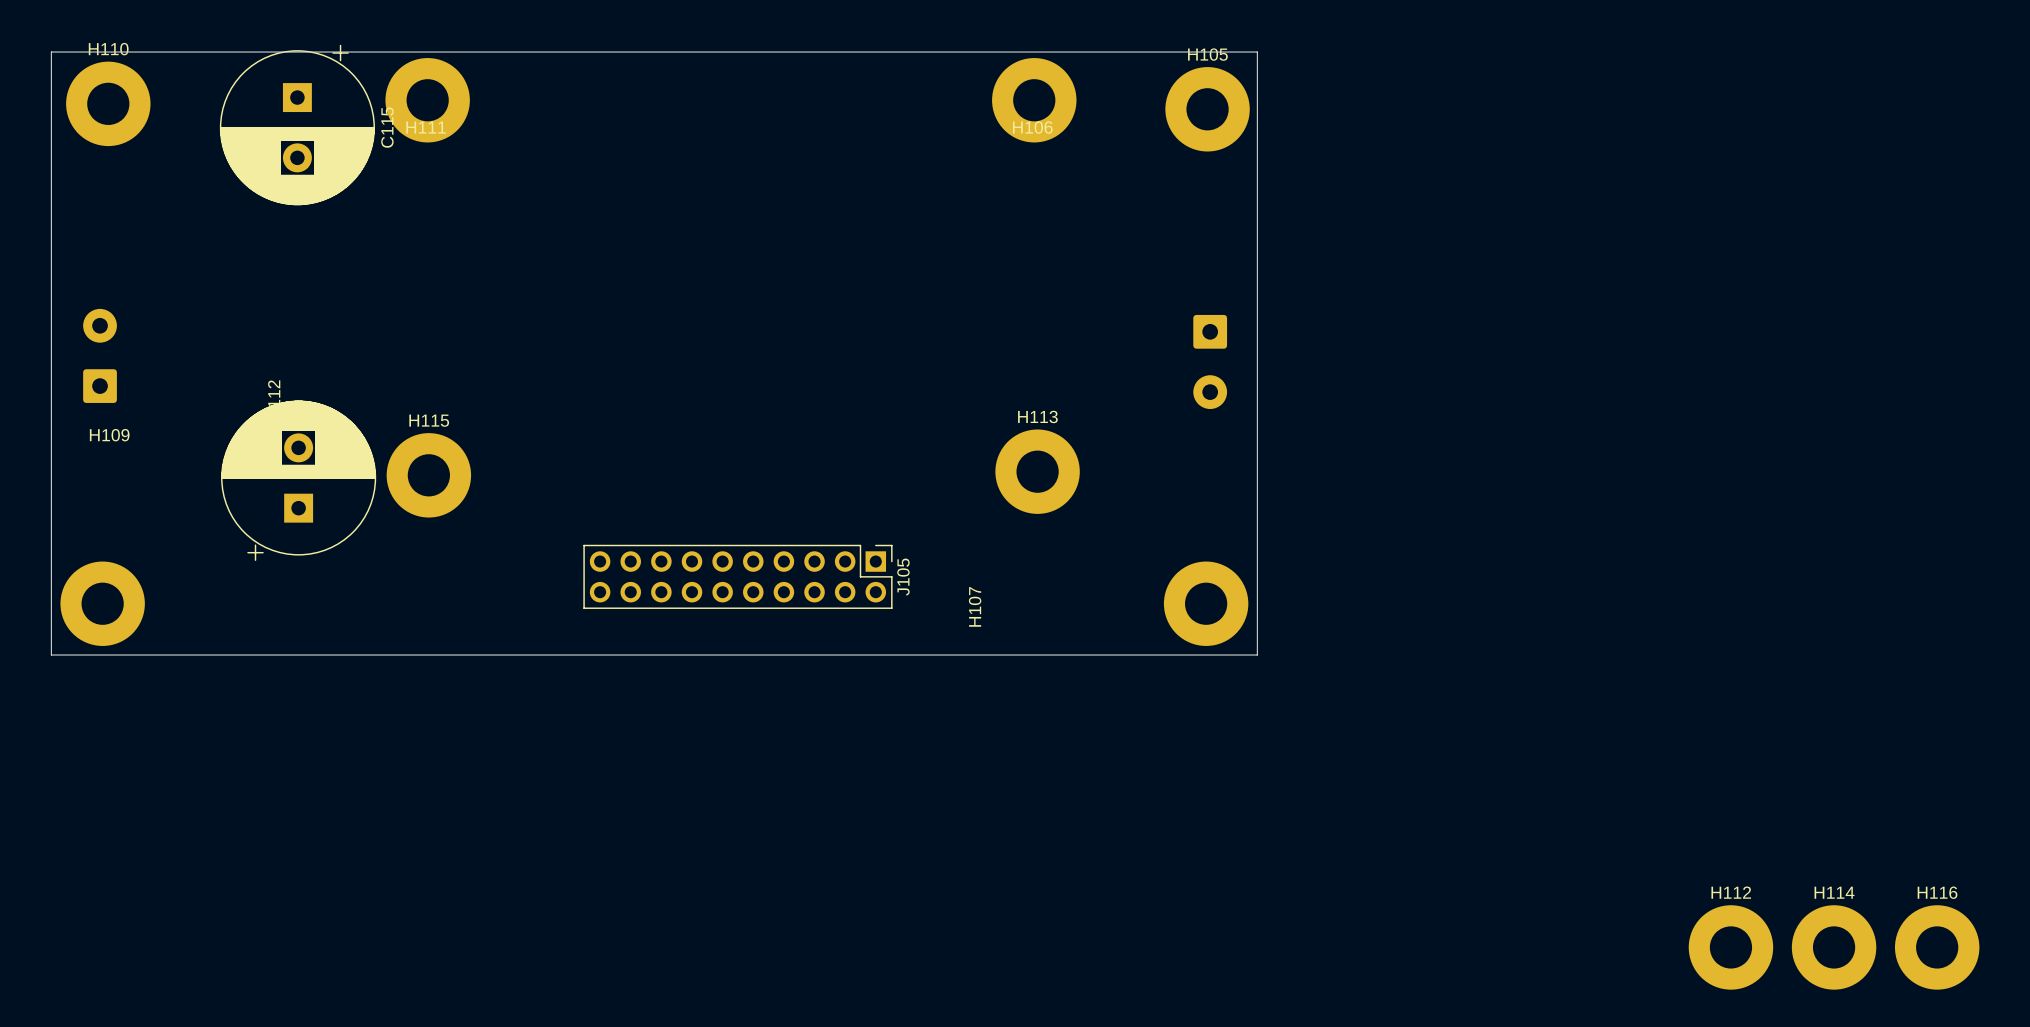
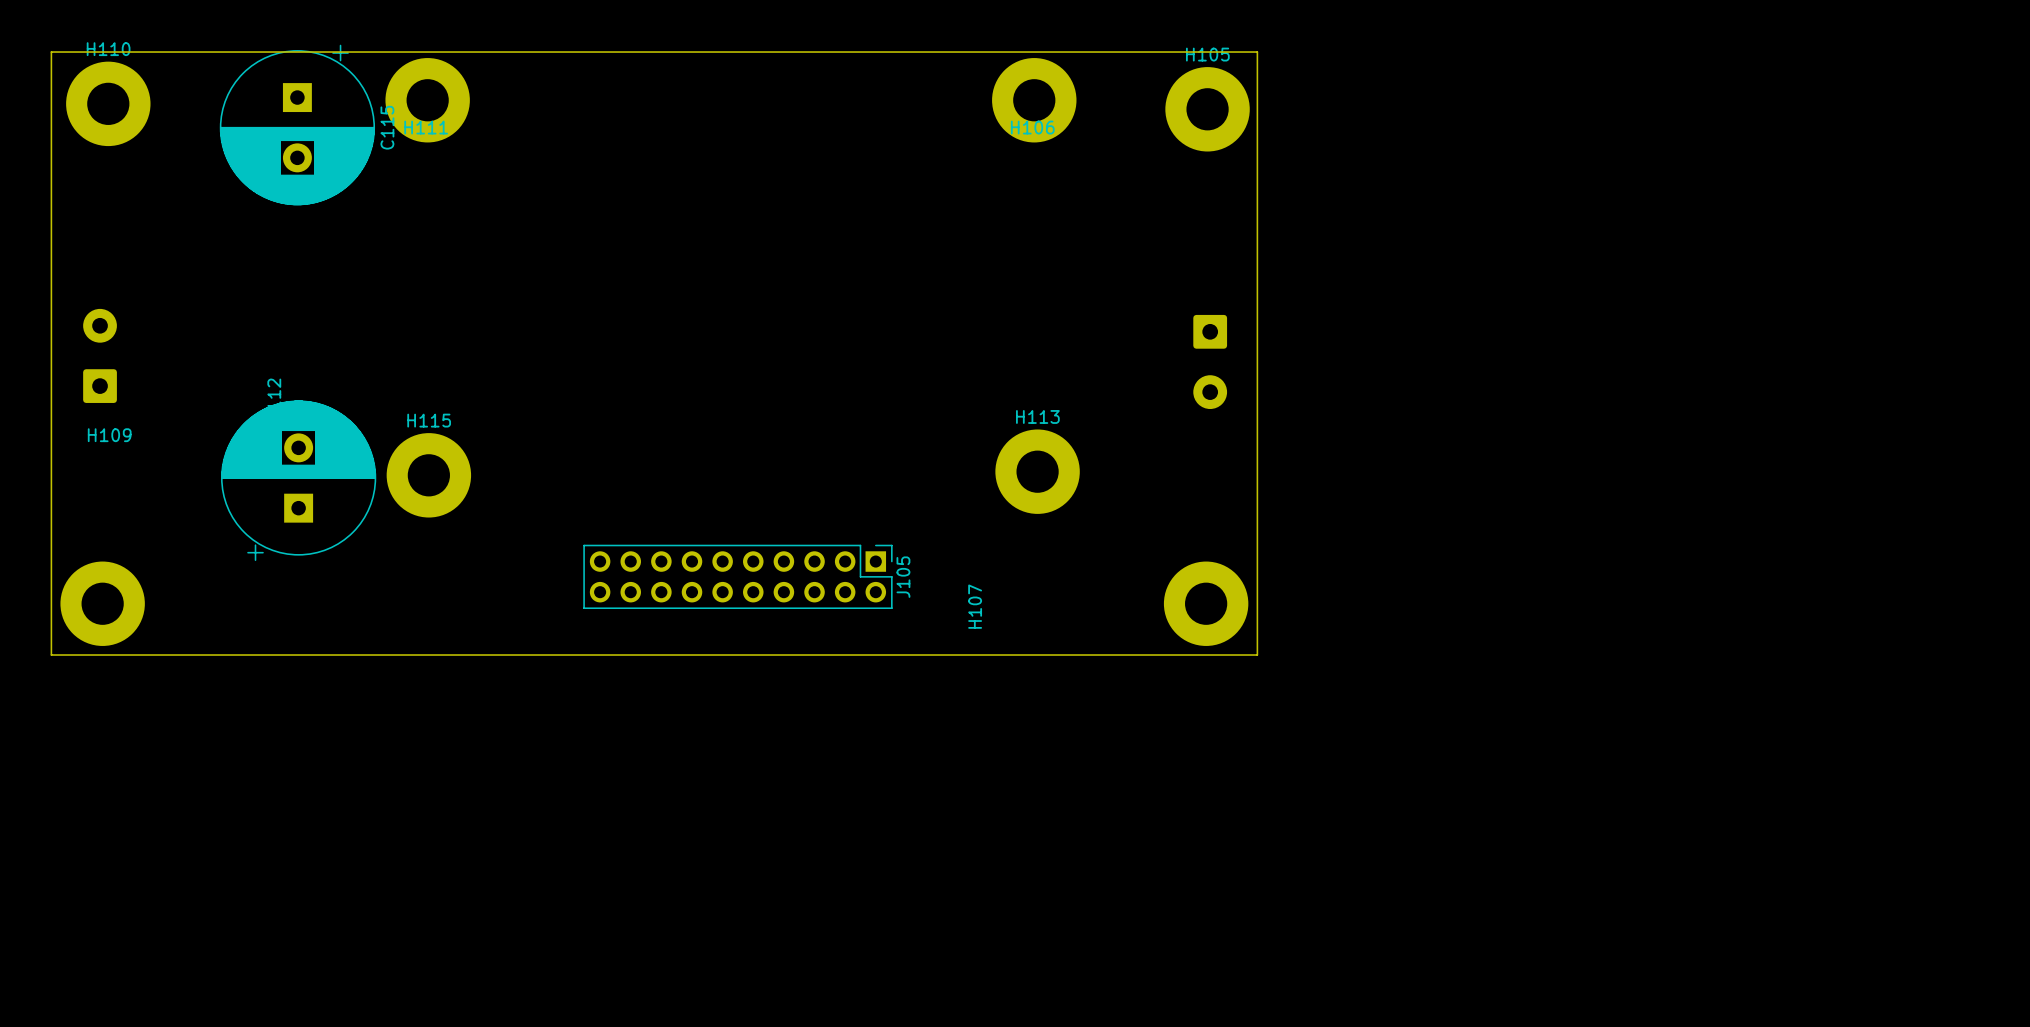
H112: (1730, 947) -> none
H114: (1834, 947) -> none
H116: (1937, 947) -> none

